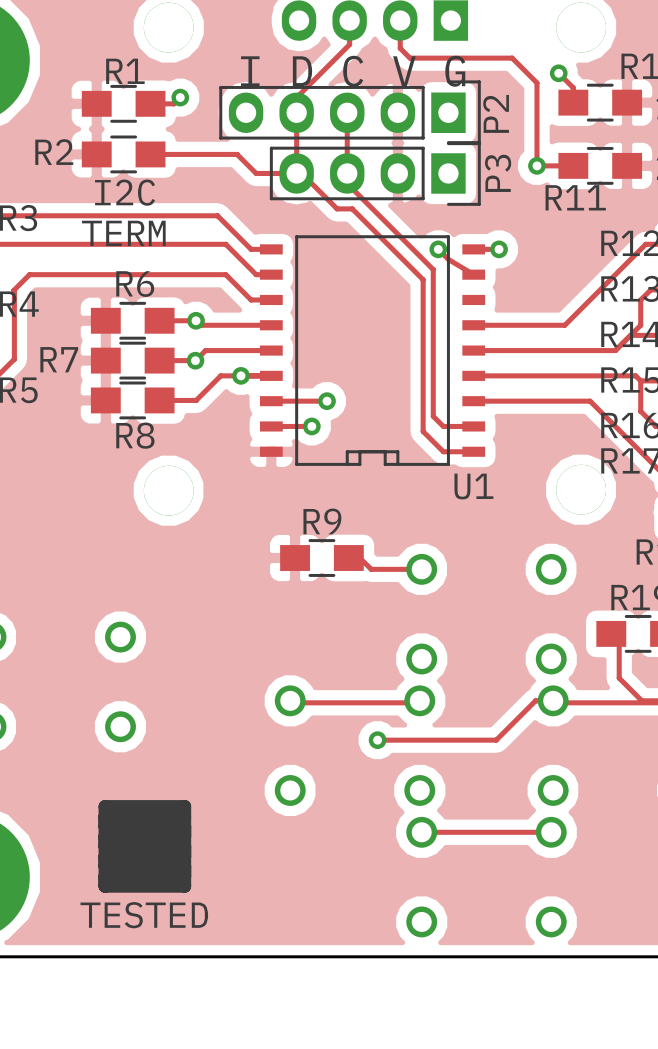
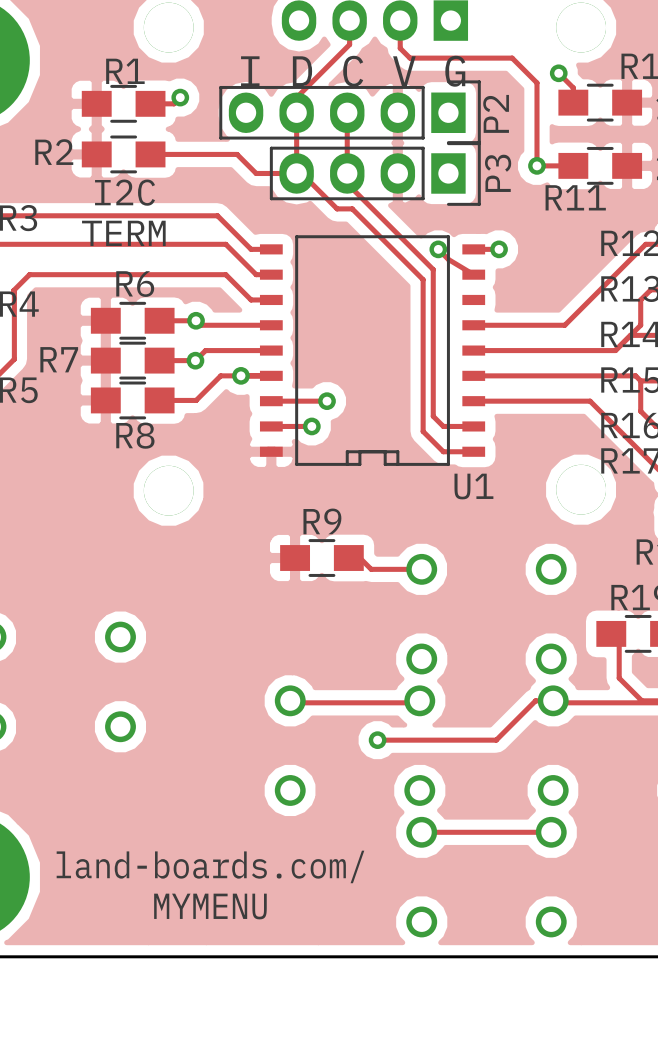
TESTED: (144, 846) -> none
text: none -> land-boards.com/ (210, 866)
text: none -> MYMENU (210, 906)

